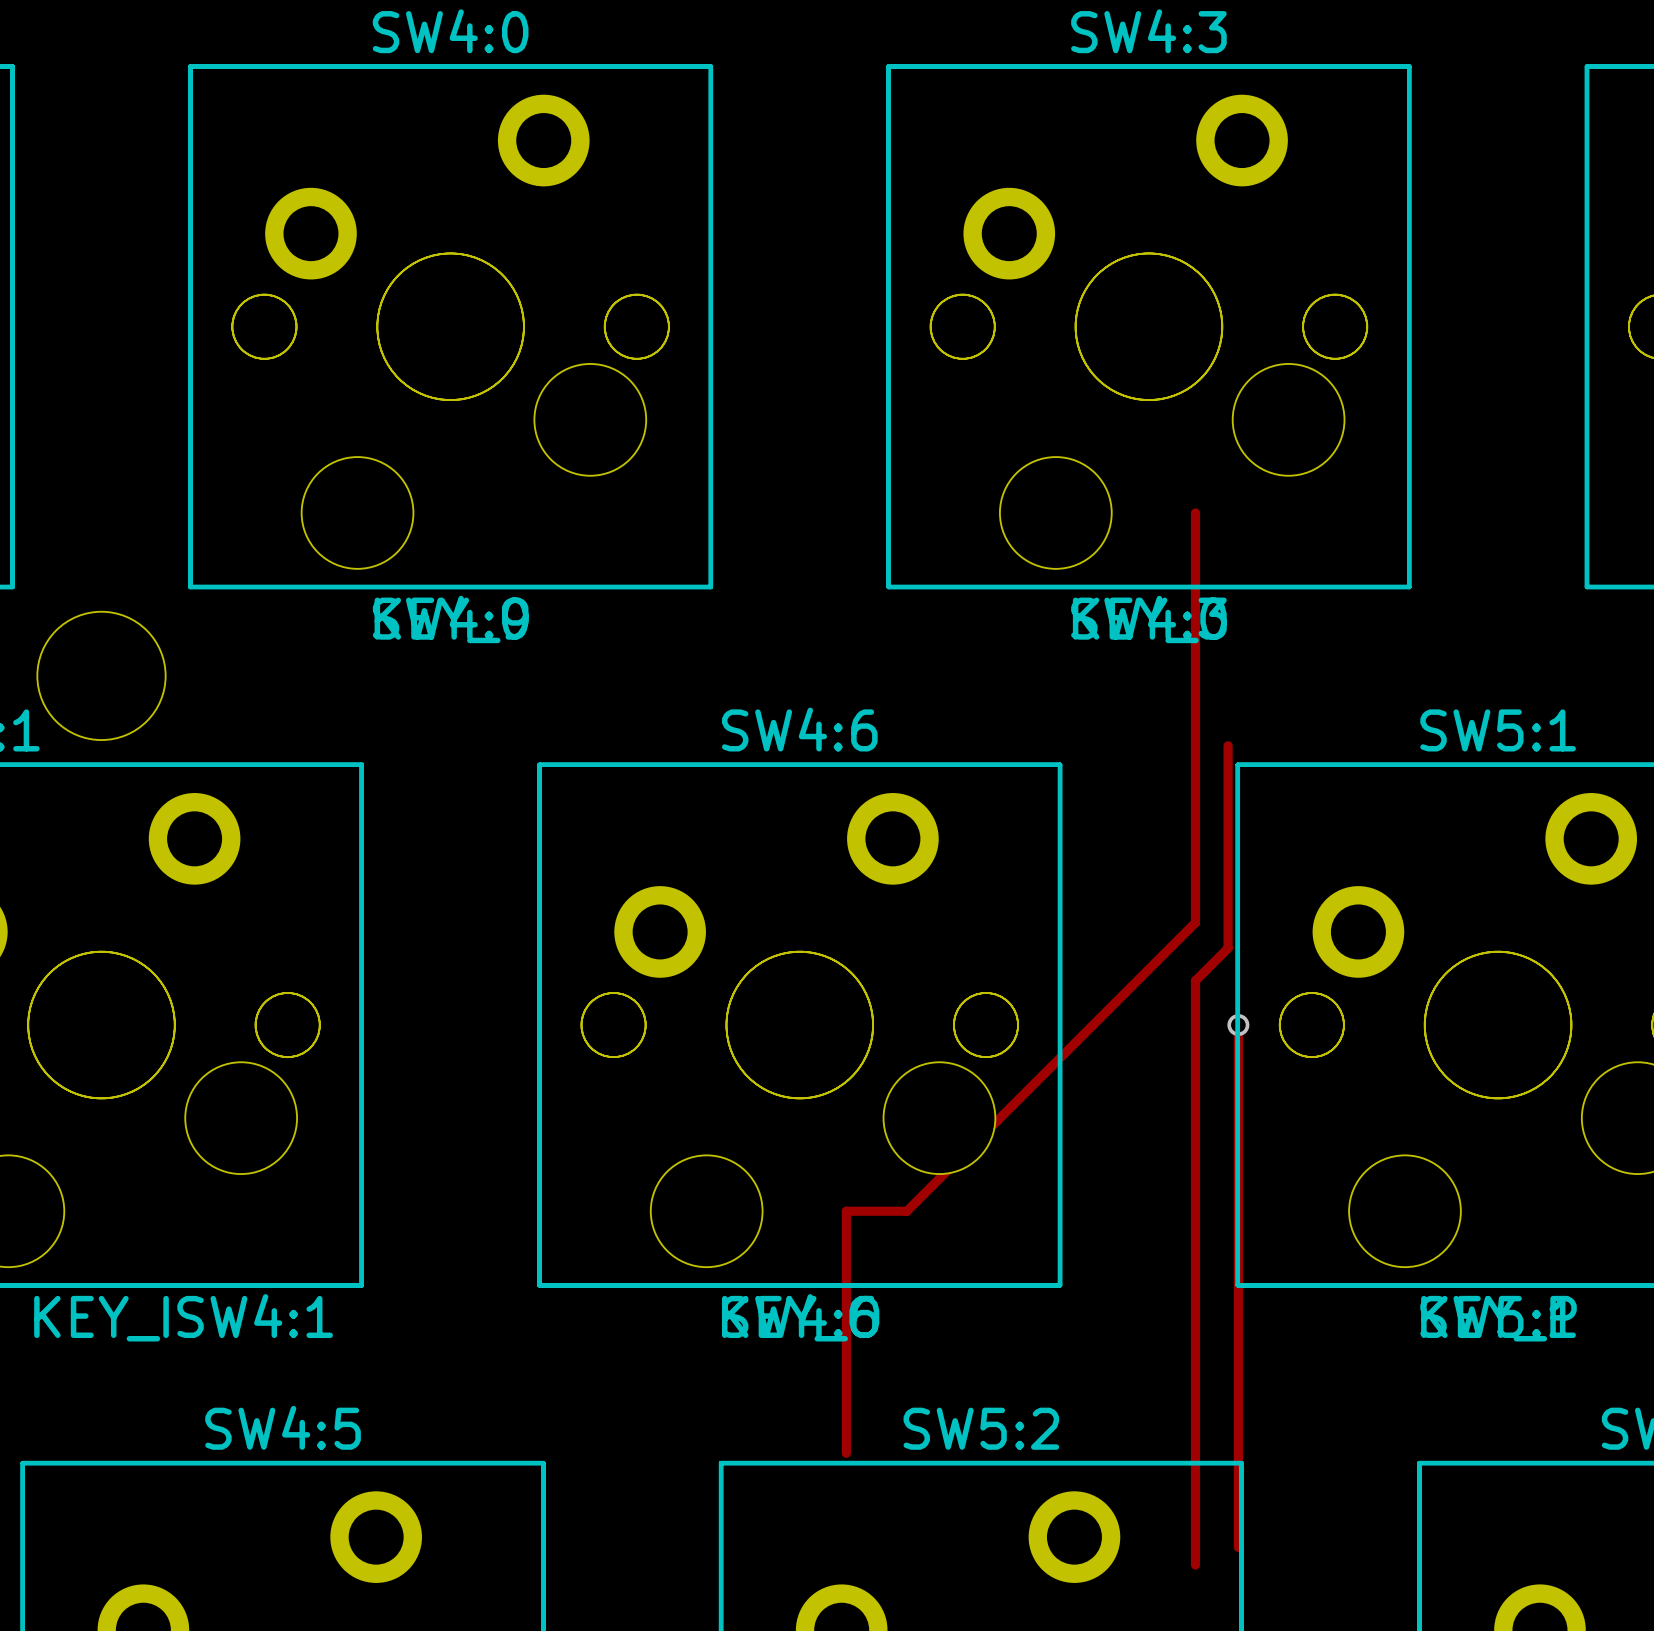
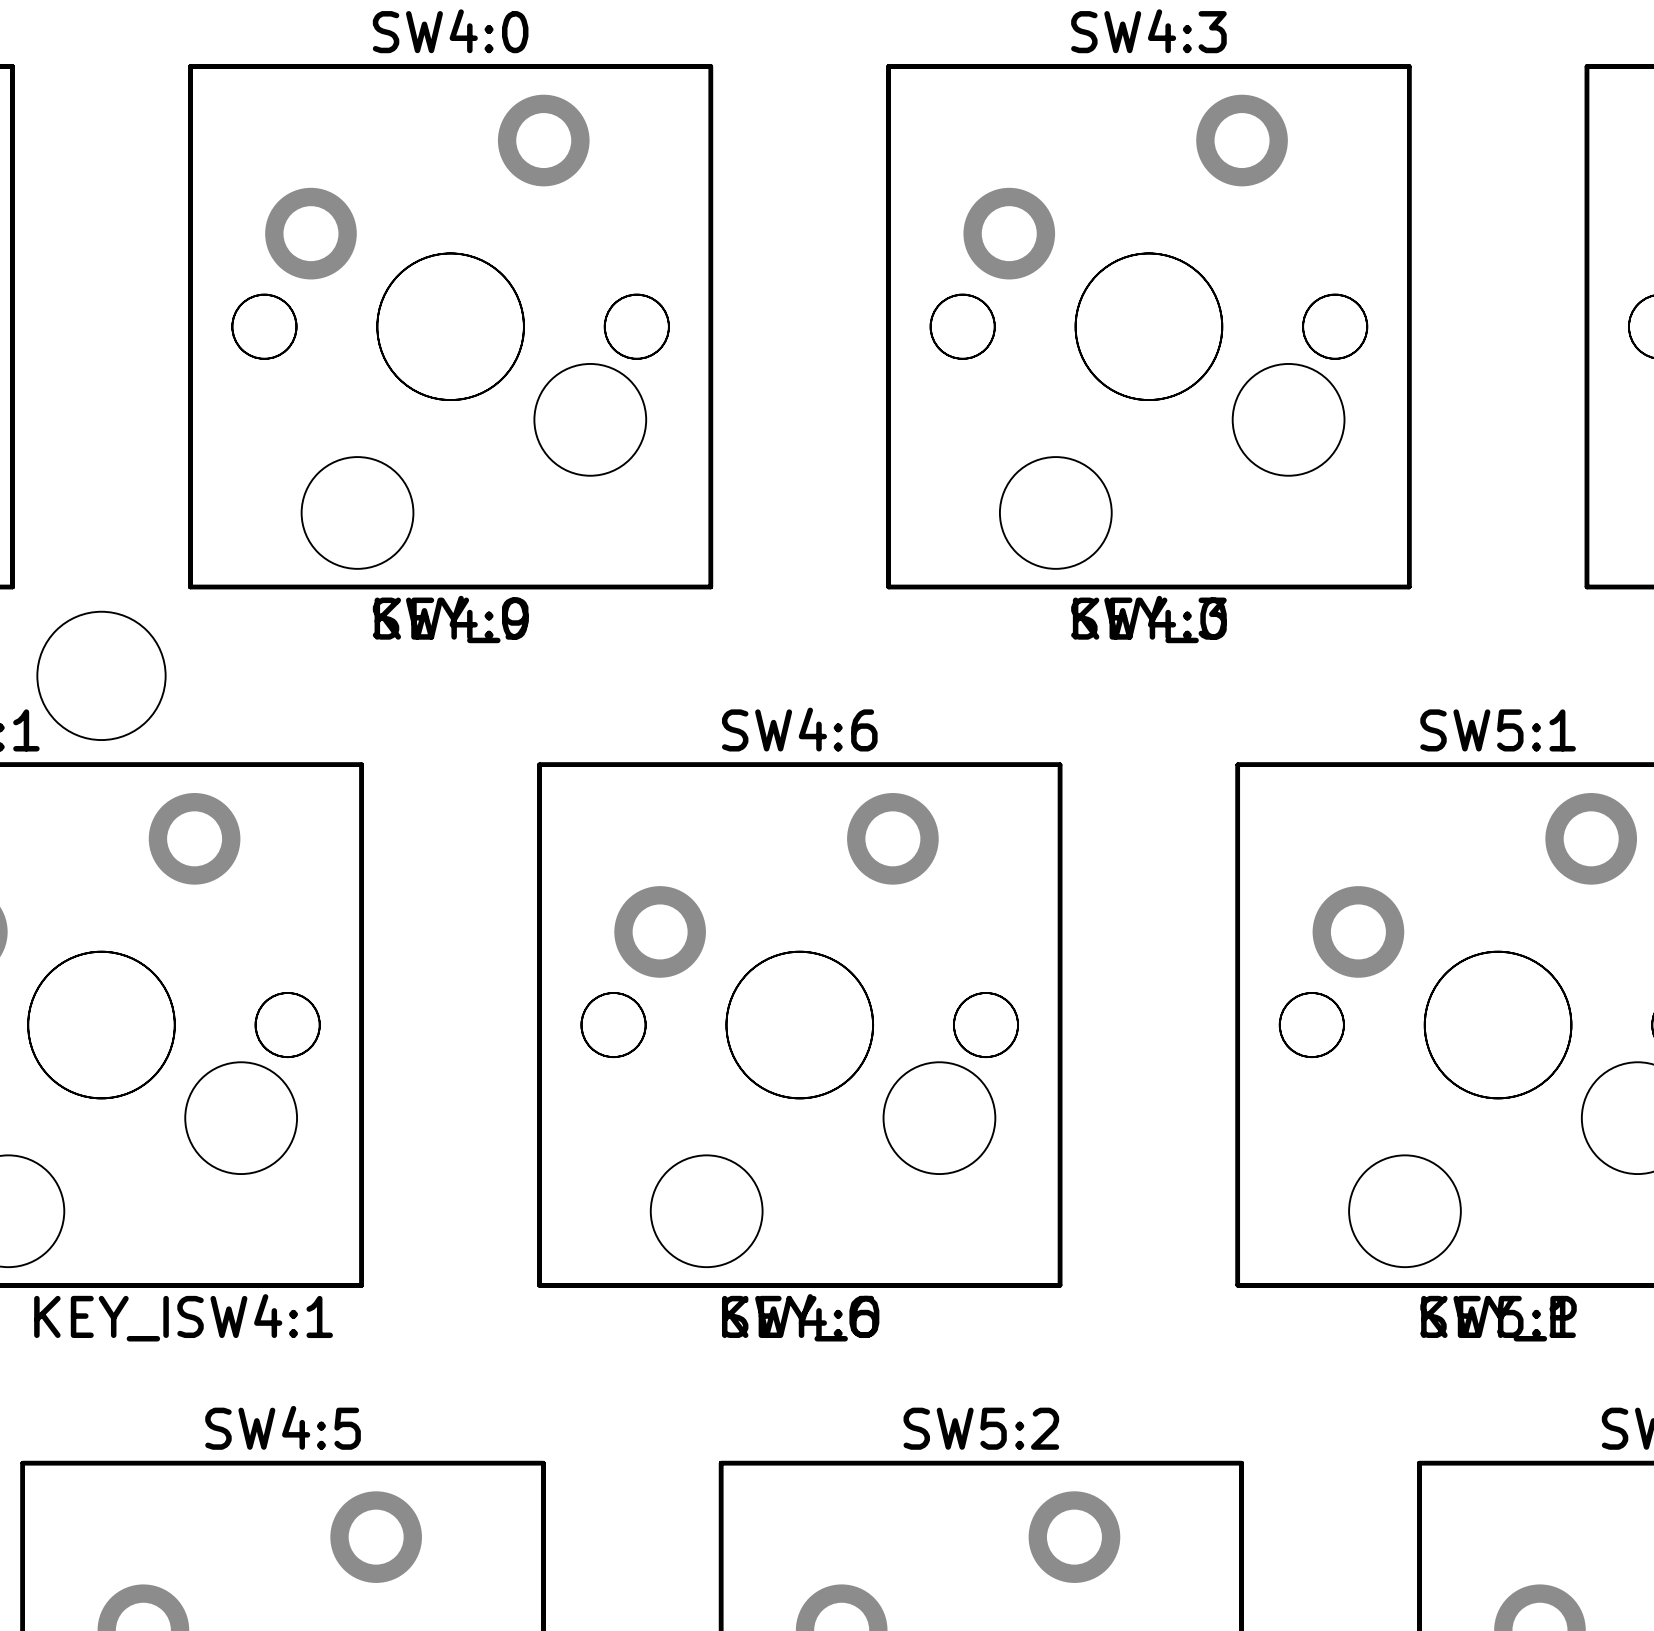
track: (1195, 512) (1195, 922) (906, 1211) (846, 1211) (846, 1453) -> none
track: (1228, 745) (1228, 948) (1195, 980) (1195, 1565) -> none
track: (1238, 1025) (1238, 1547) -> none
via: (1238, 1025) -> none

